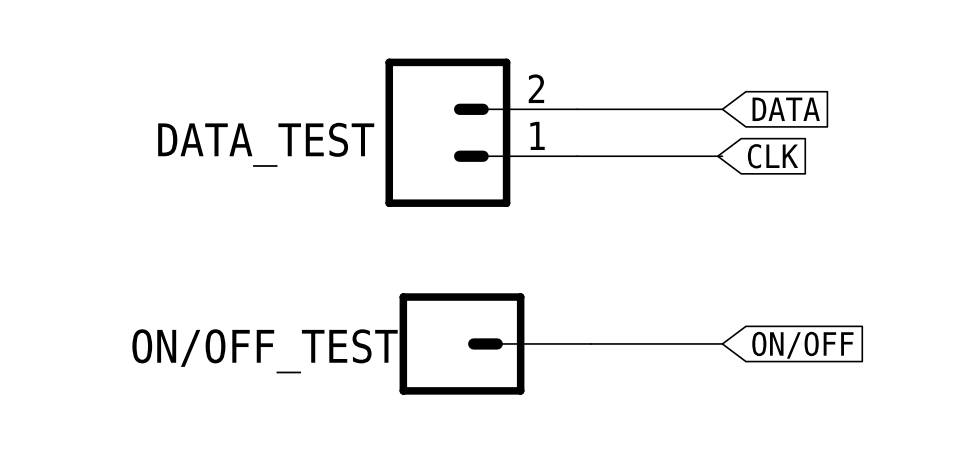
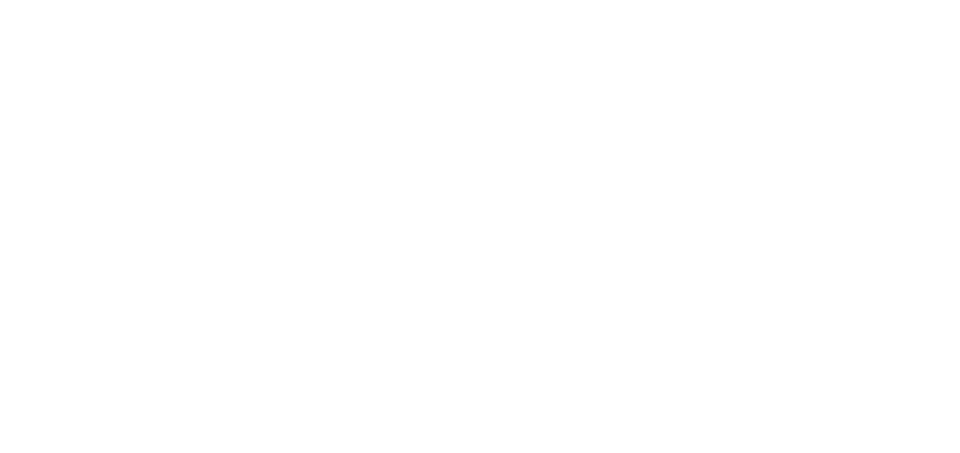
wire: (576, 109) (722, 109) -> none
global label: DATA (786, 109) -> none
DATA_TEST: (481, 132) -> none
wire: (576, 156) (722, 156) -> none
global label: CLK (773, 156) -> none
ON/OFF_TEST: (495, 343) -> none
wire: (591, 343) (722, 343) -> none
global label: ON/OFF (802, 345) -> none

